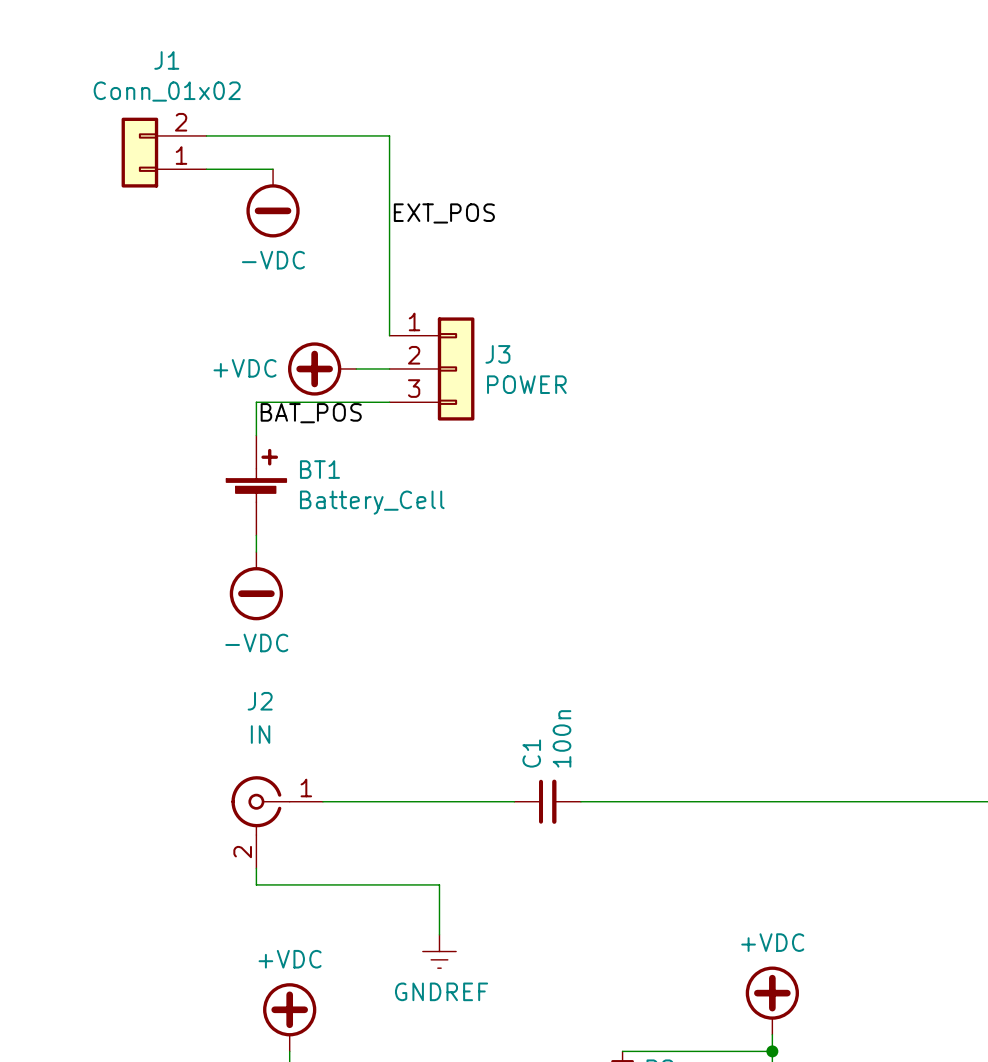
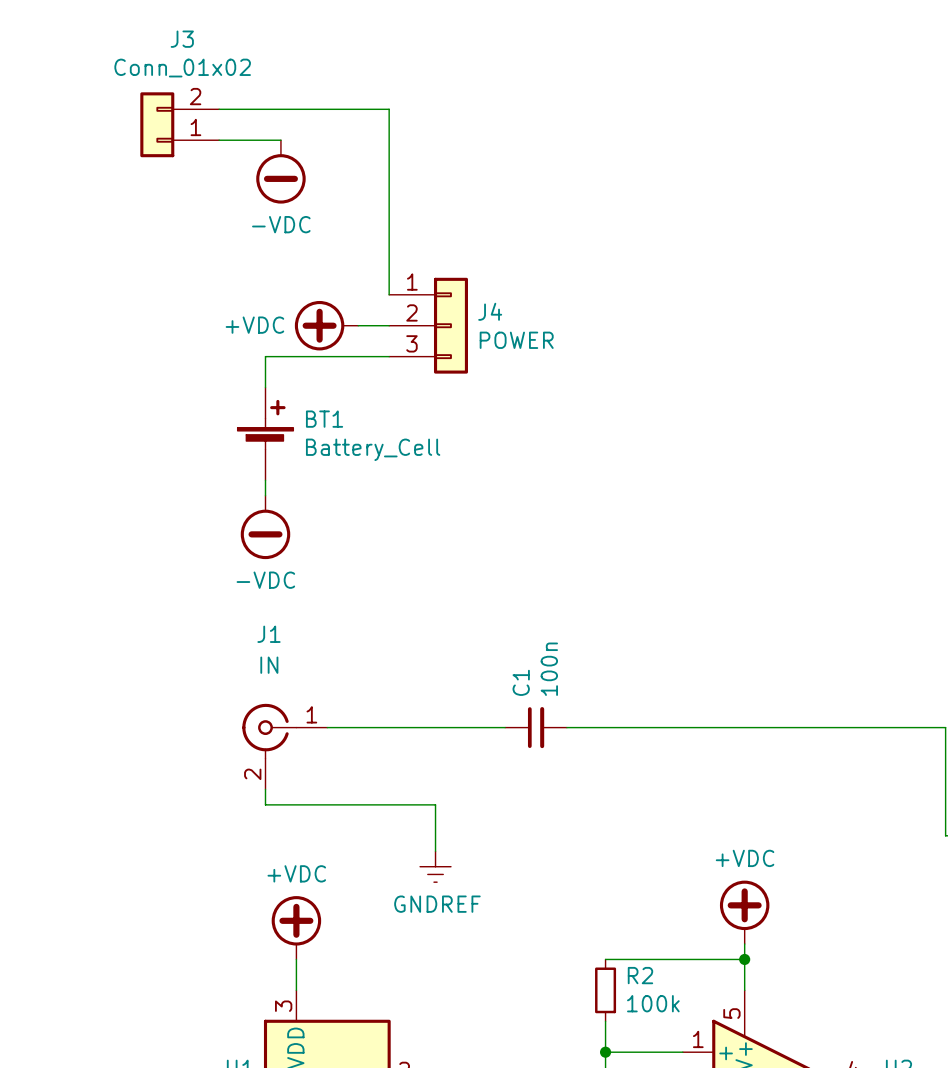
J1 name: J1 (166, 60) -> J3 (182, 39)
label: EXT_POS (444, 213) -> none
J3 name: J3 (497, 354) -> J4 (490, 311)
label: BAT_POS (311, 413) -> none
J2 name: J2 (260, 701) -> J1 (268, 634)

